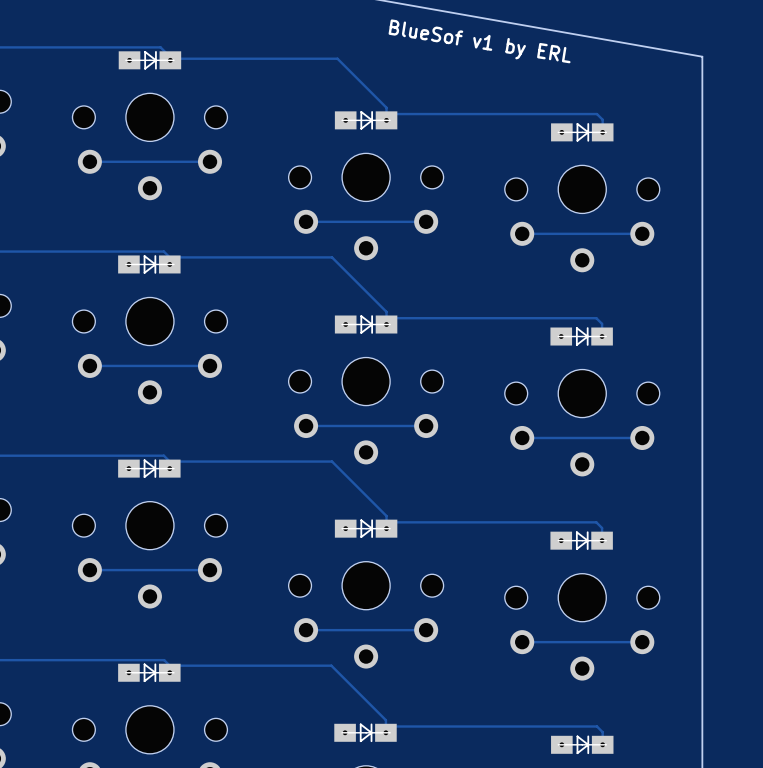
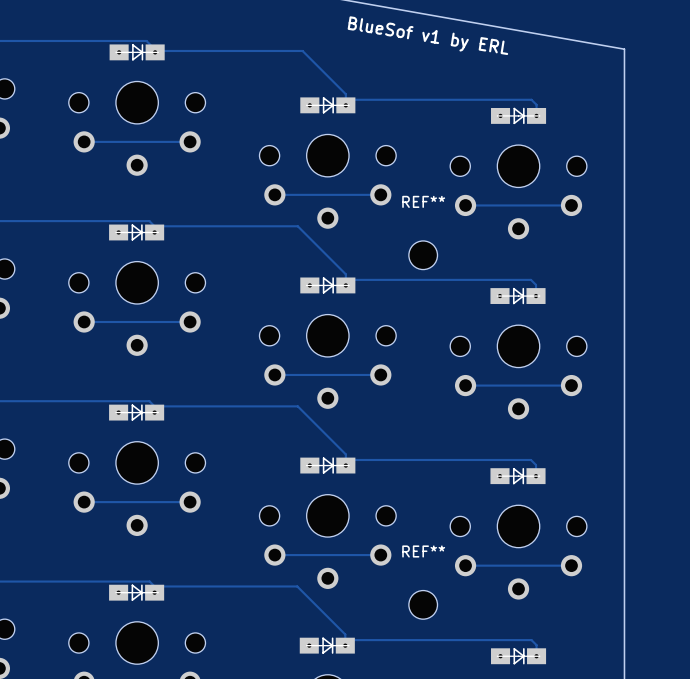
REF**: none -> (423, 255)
REF**: none -> (423, 604)

